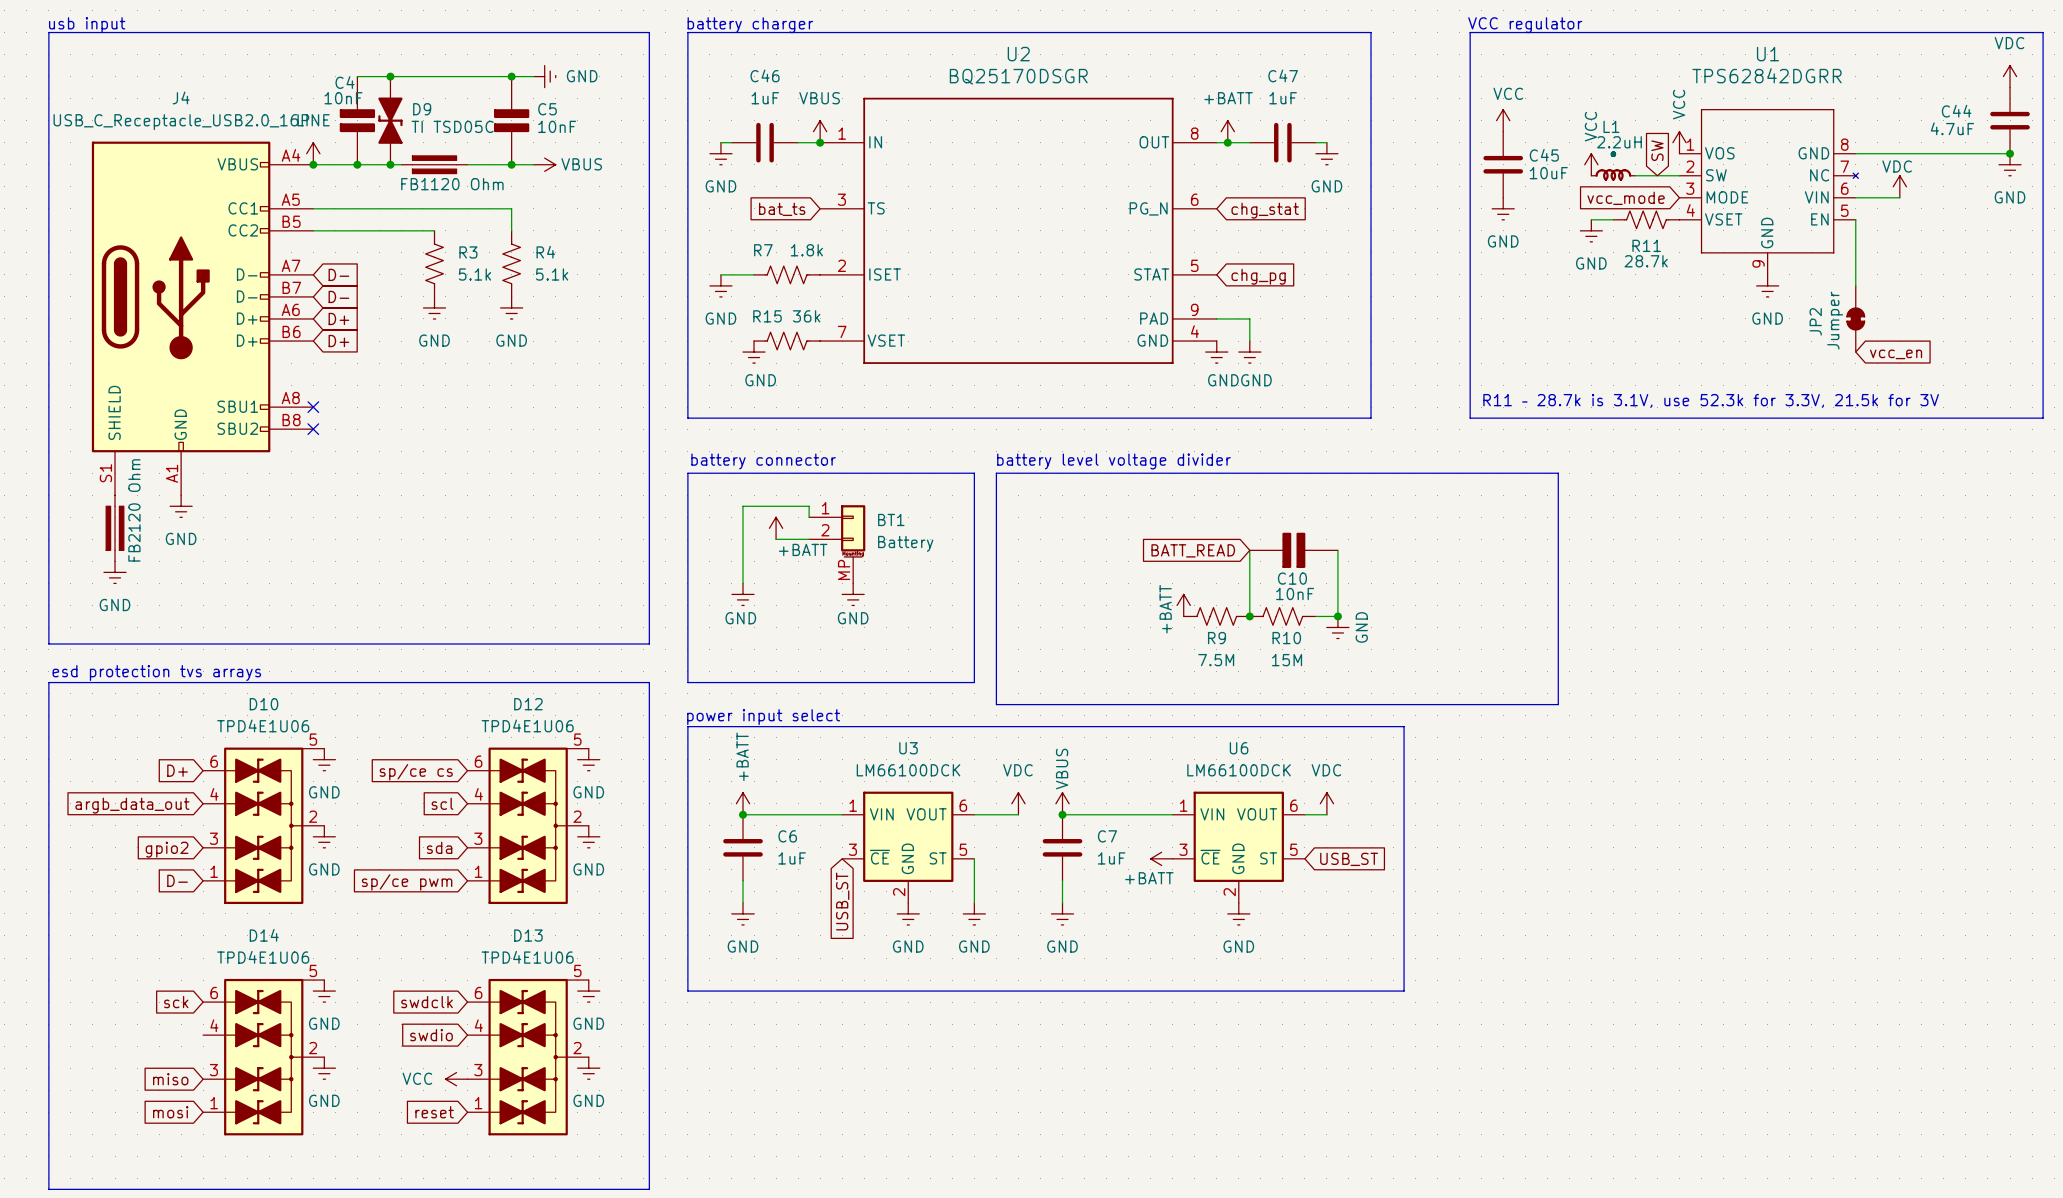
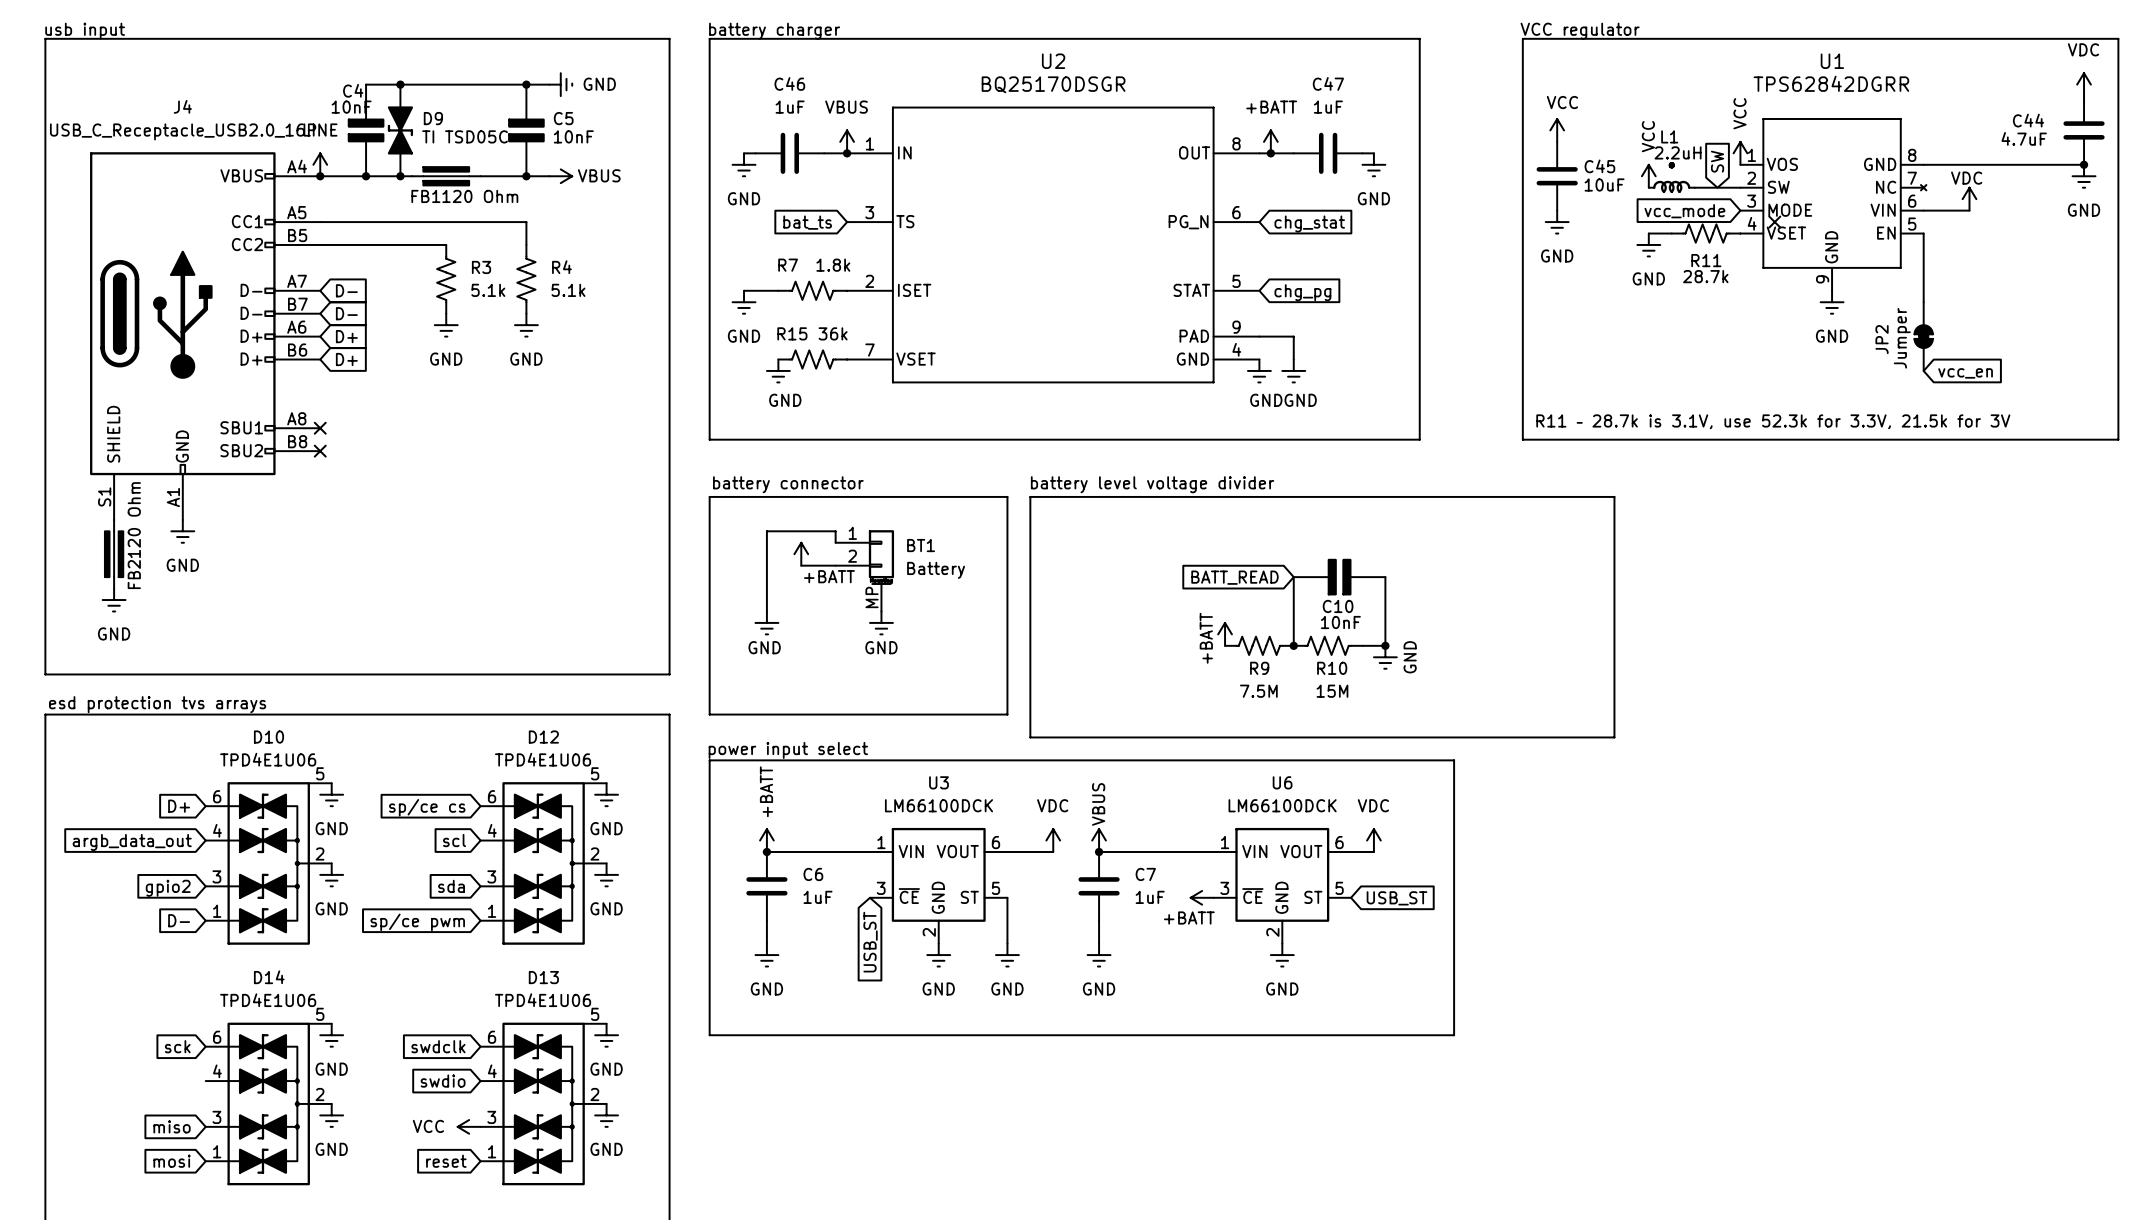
no-connect mark: none -> (1774, 222)

